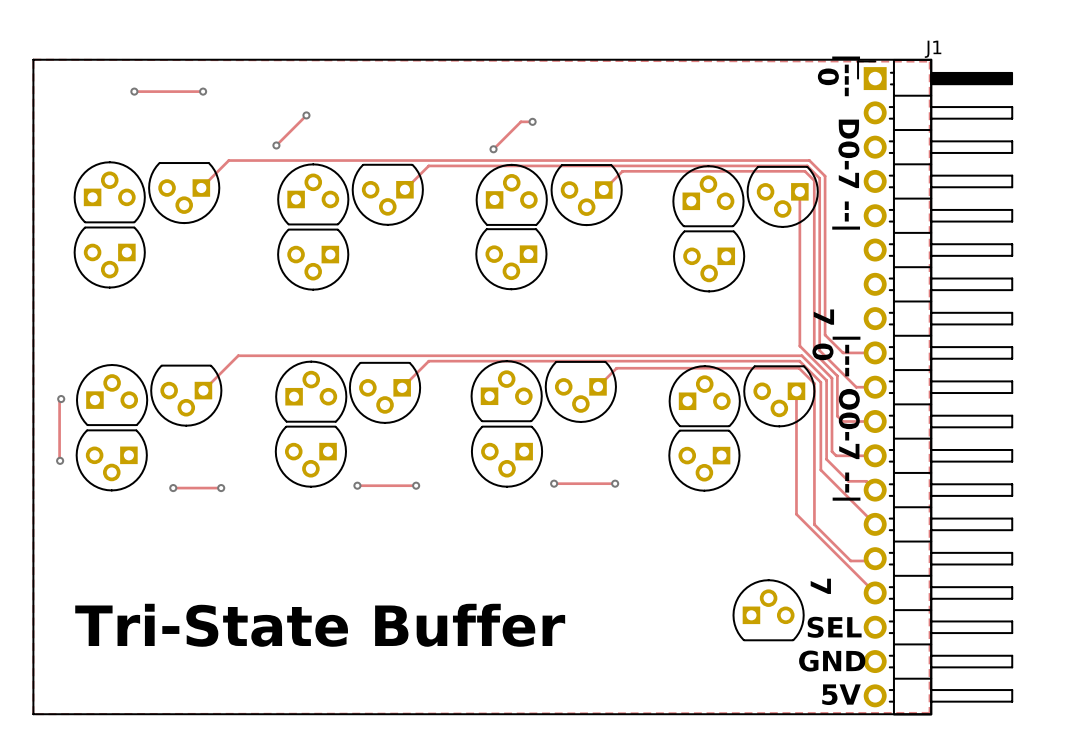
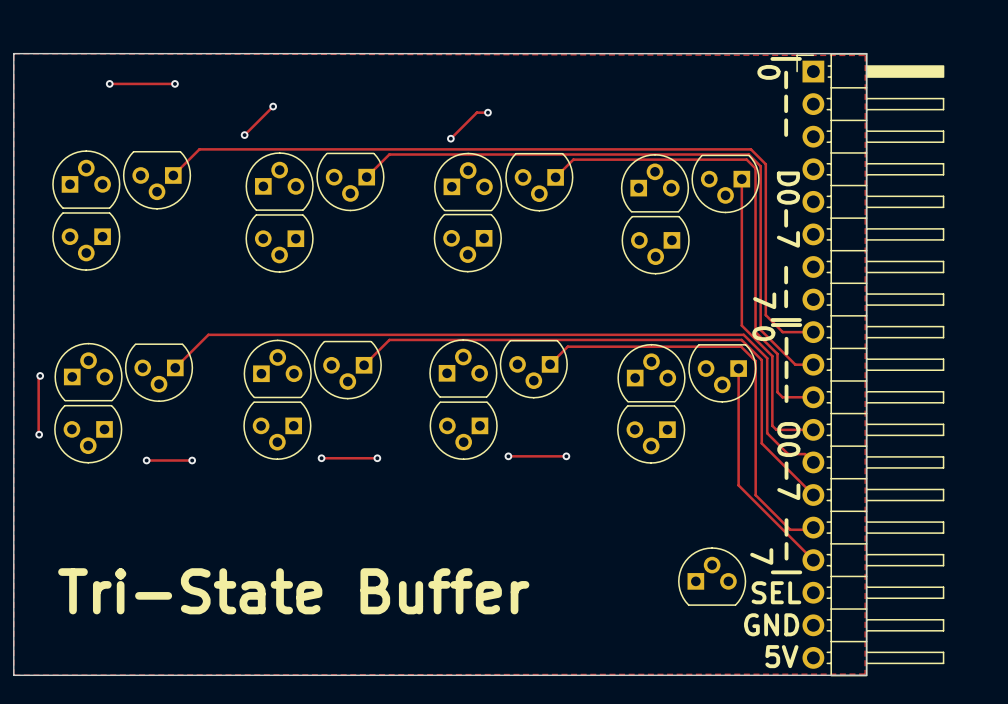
J1 name: J1 (933, 49) -> none

